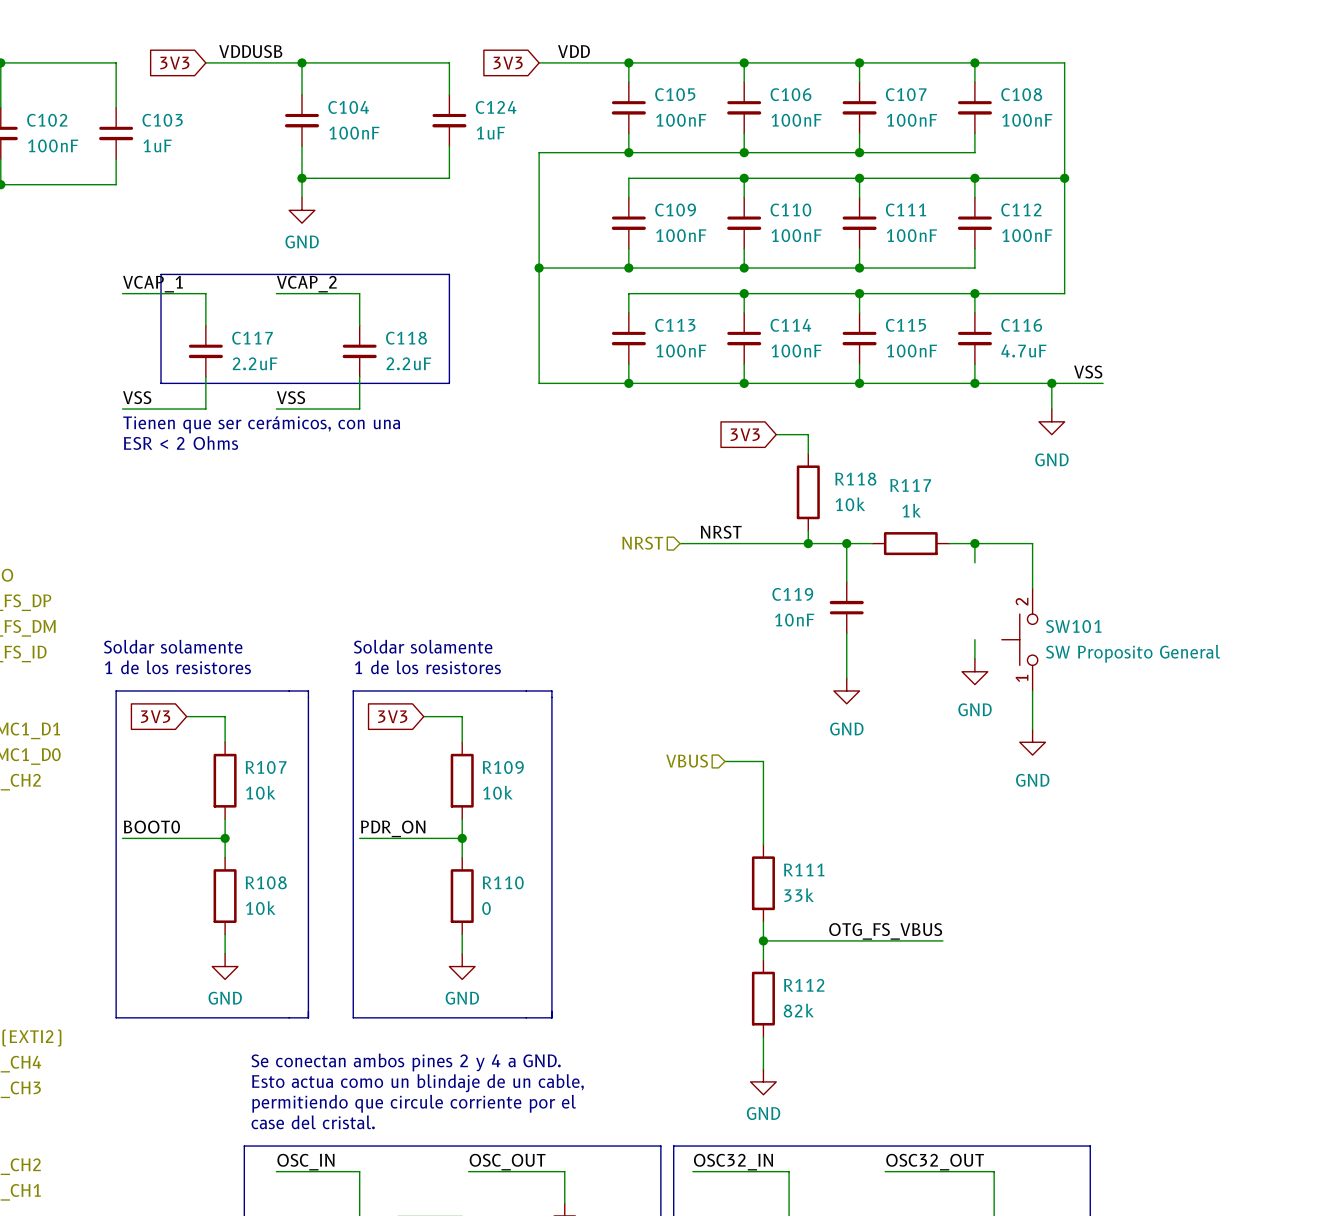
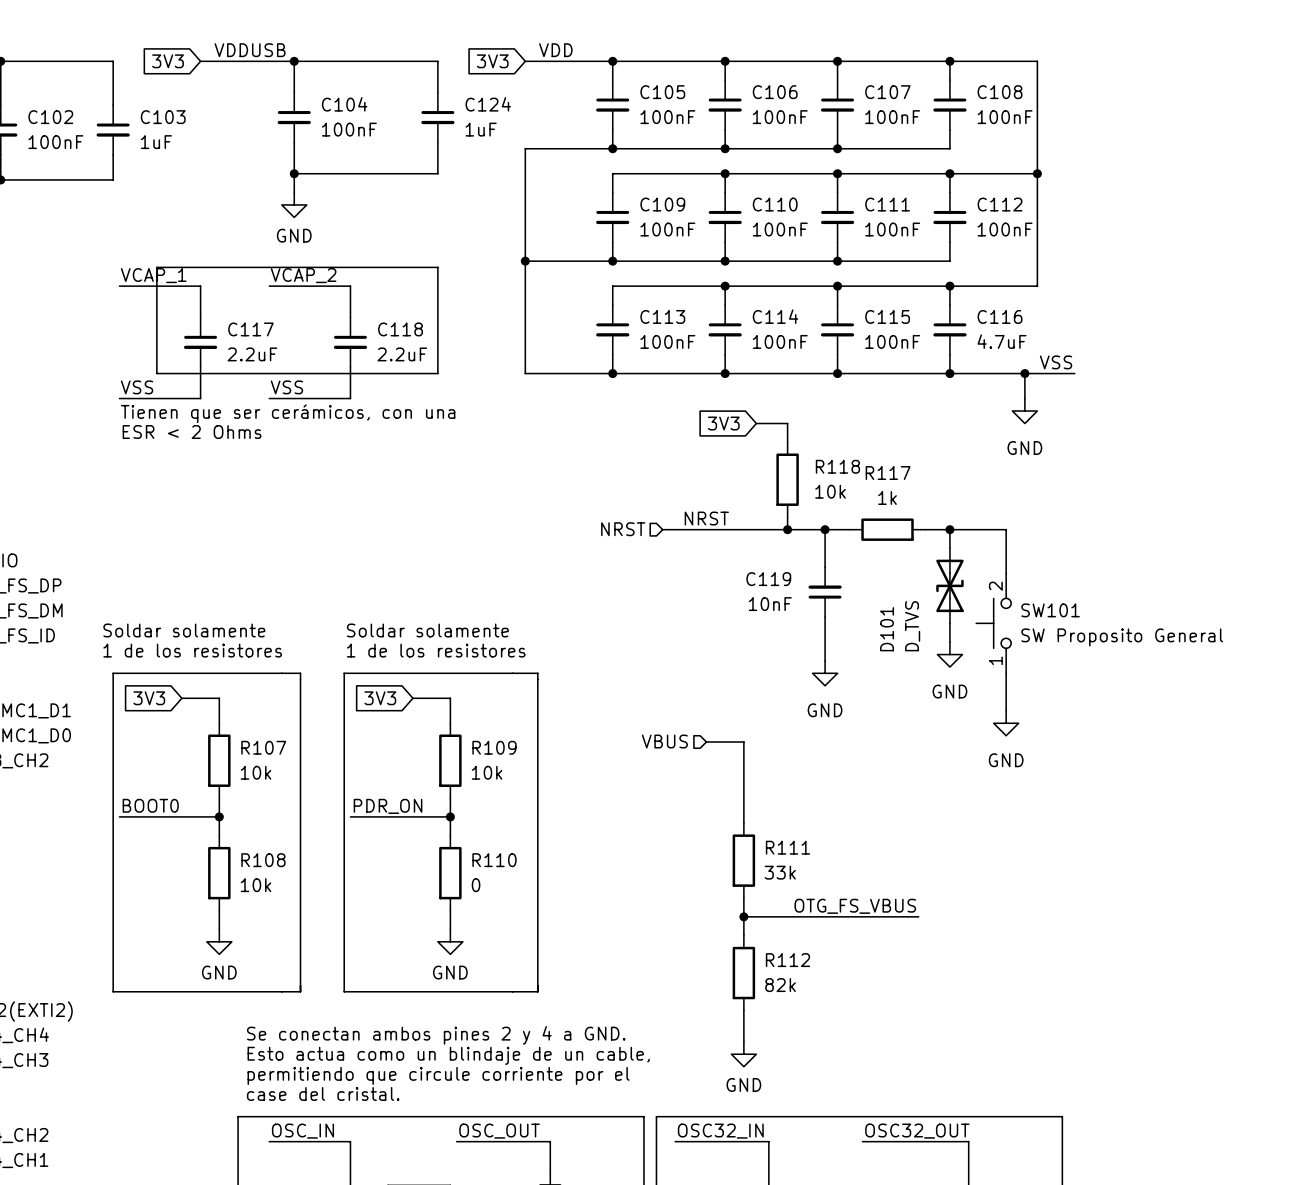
D101: none -> D_TVS (949, 585)

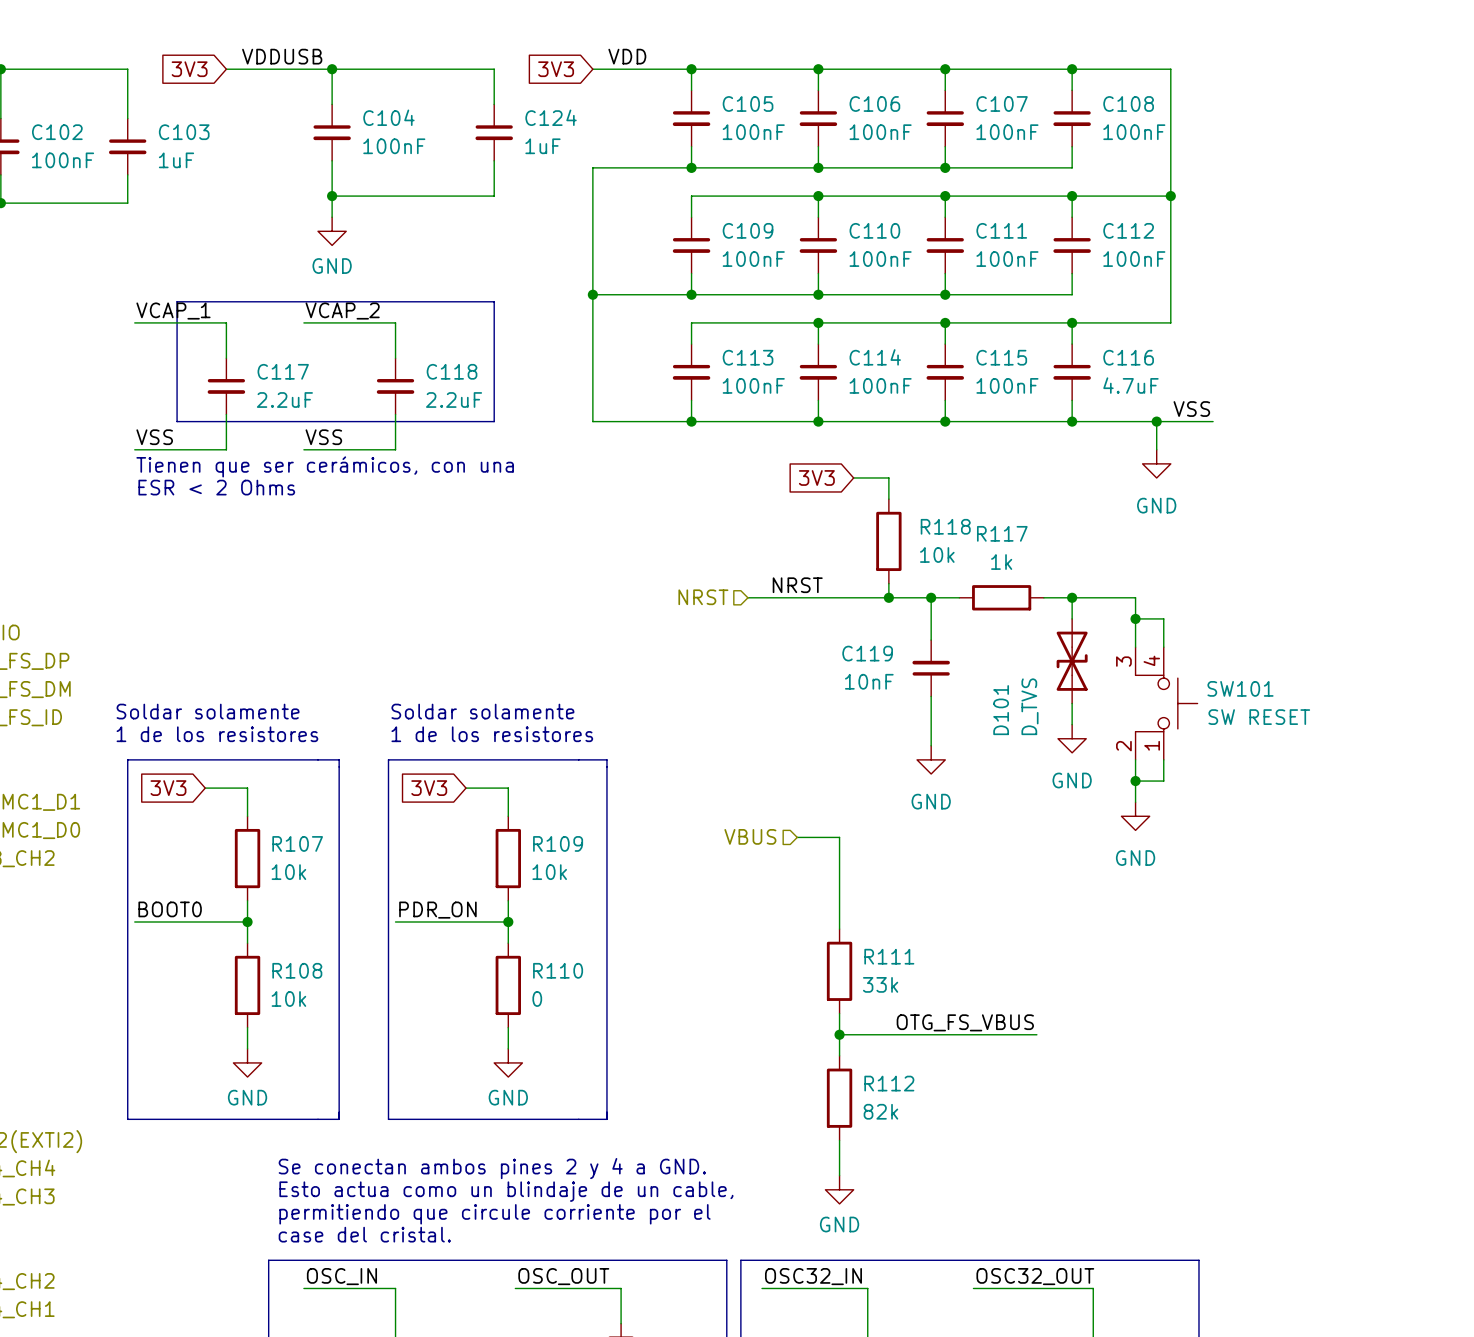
wire: none -> (1135, 618) (1163, 618) (1163, 647)
junction: none -> (1135, 618)
SW101 symbol: [976, 573, 1012, 674] -> [1135, 647, 1198, 760]
SW101 value: SW Proposito General (1122, 637) -> SW RESET (1259, 717)
wire: none -> (1163, 759) (1163, 781) (1135, 781)
junction: none -> (1135, 781)

